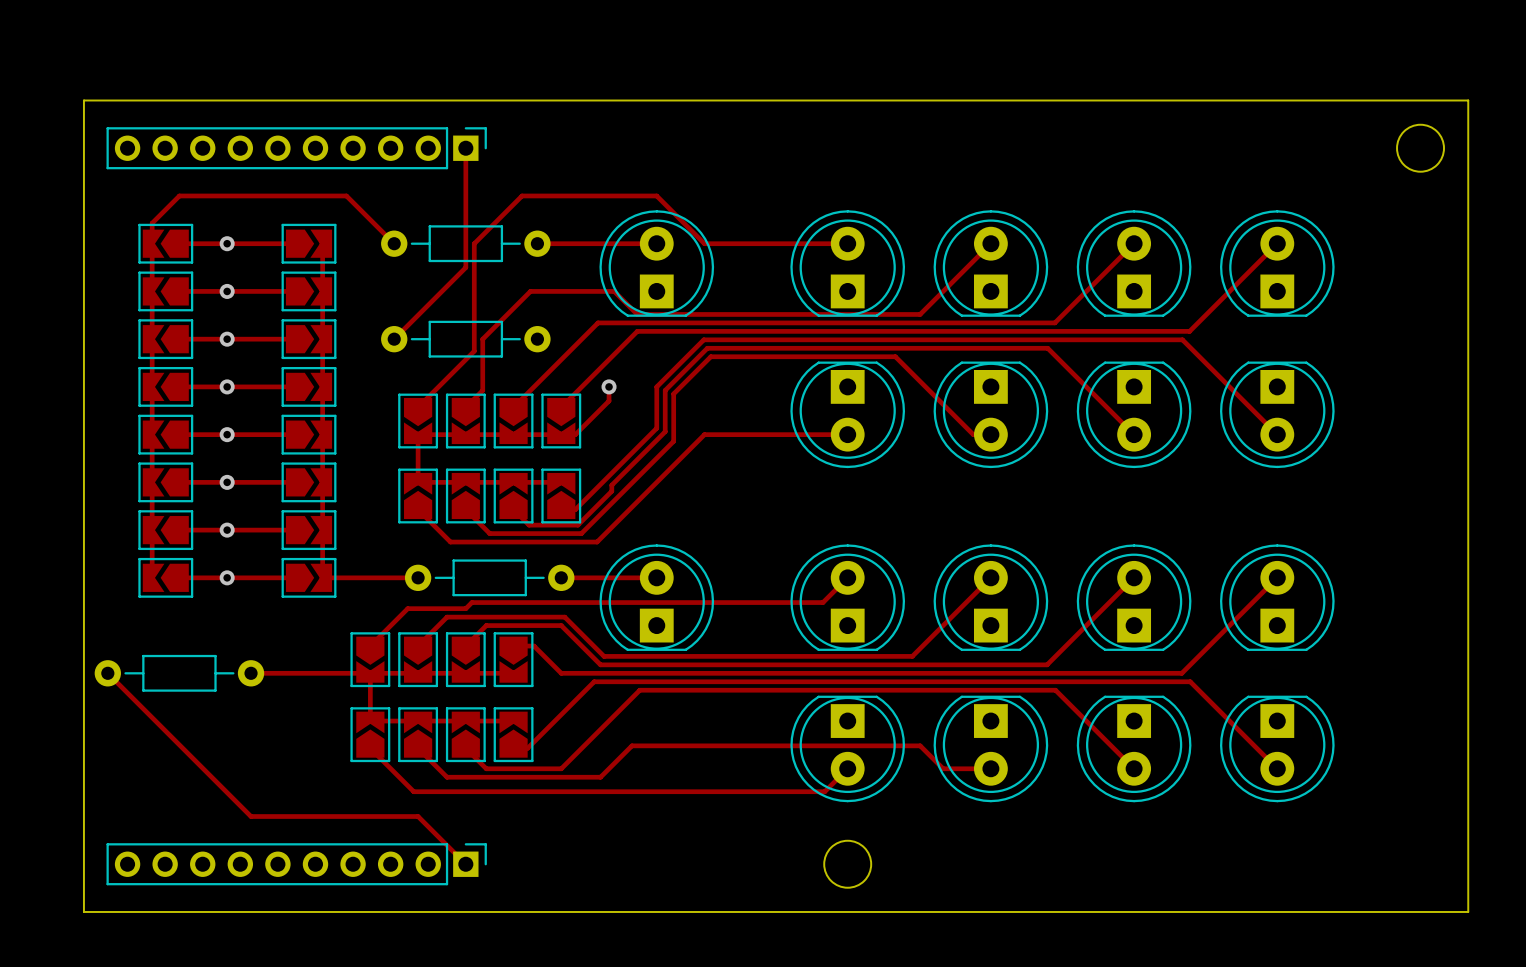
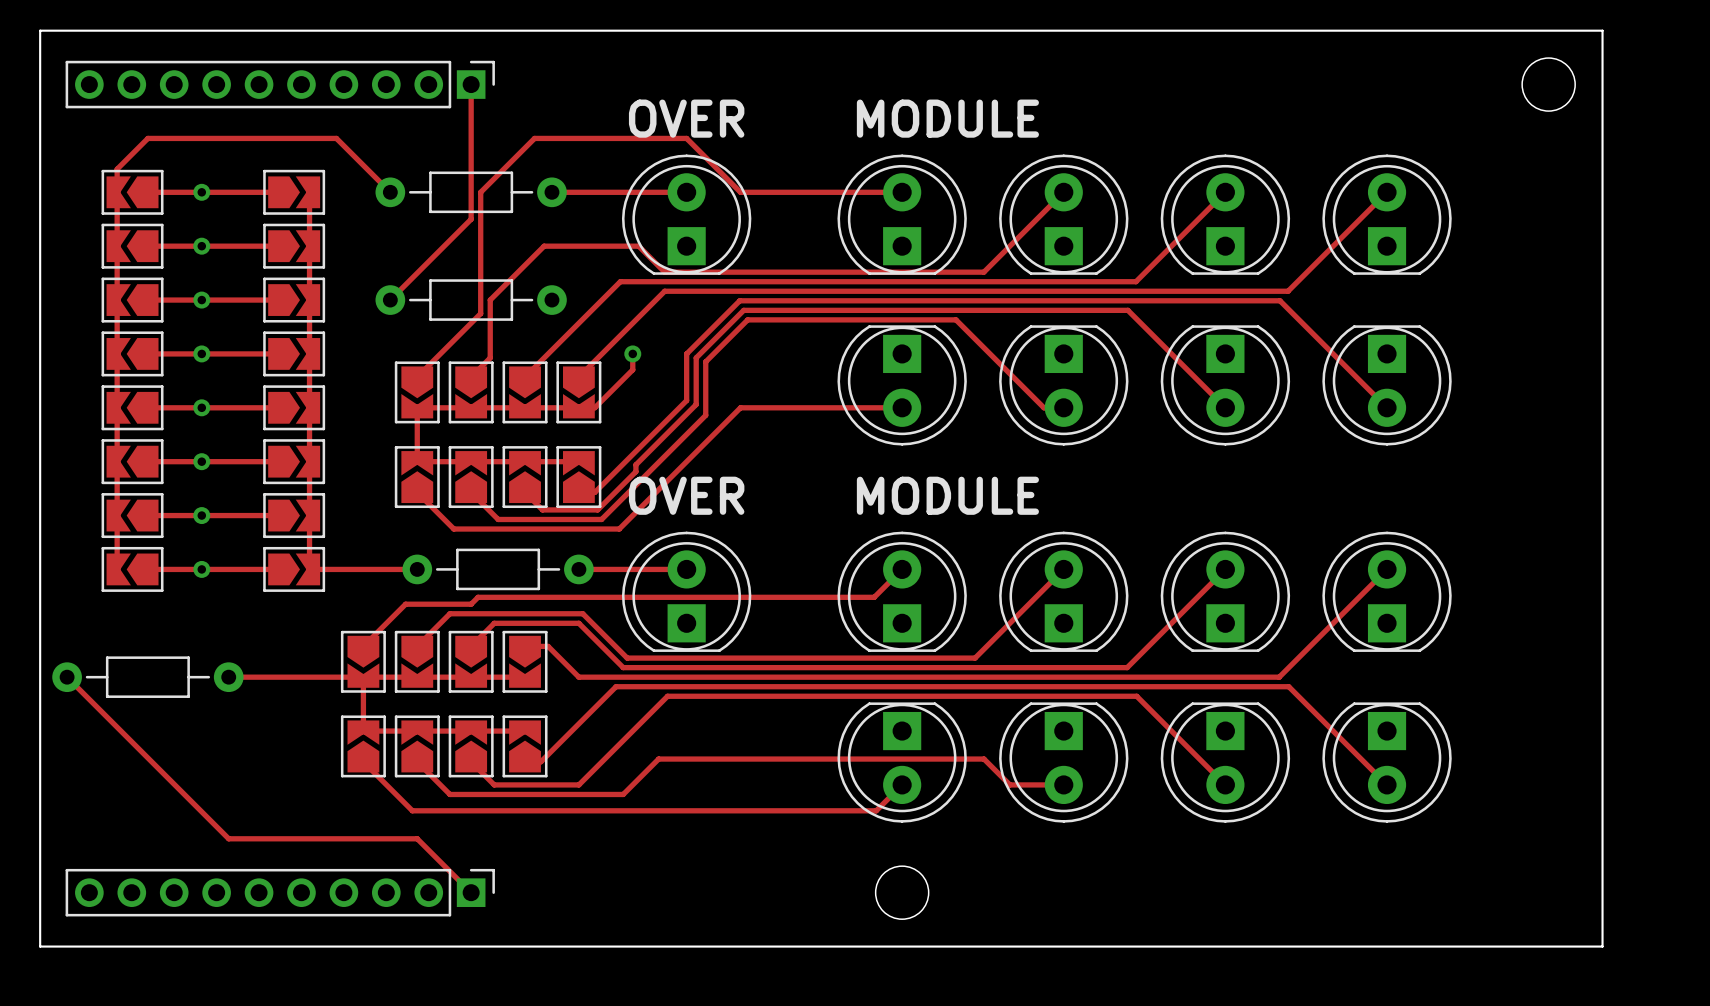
text: none -> OVER (686, 118)
text: none -> MODULE (947, 118)
text: none -> OVER (686, 495)
text: none -> MODULE (947, 495)

